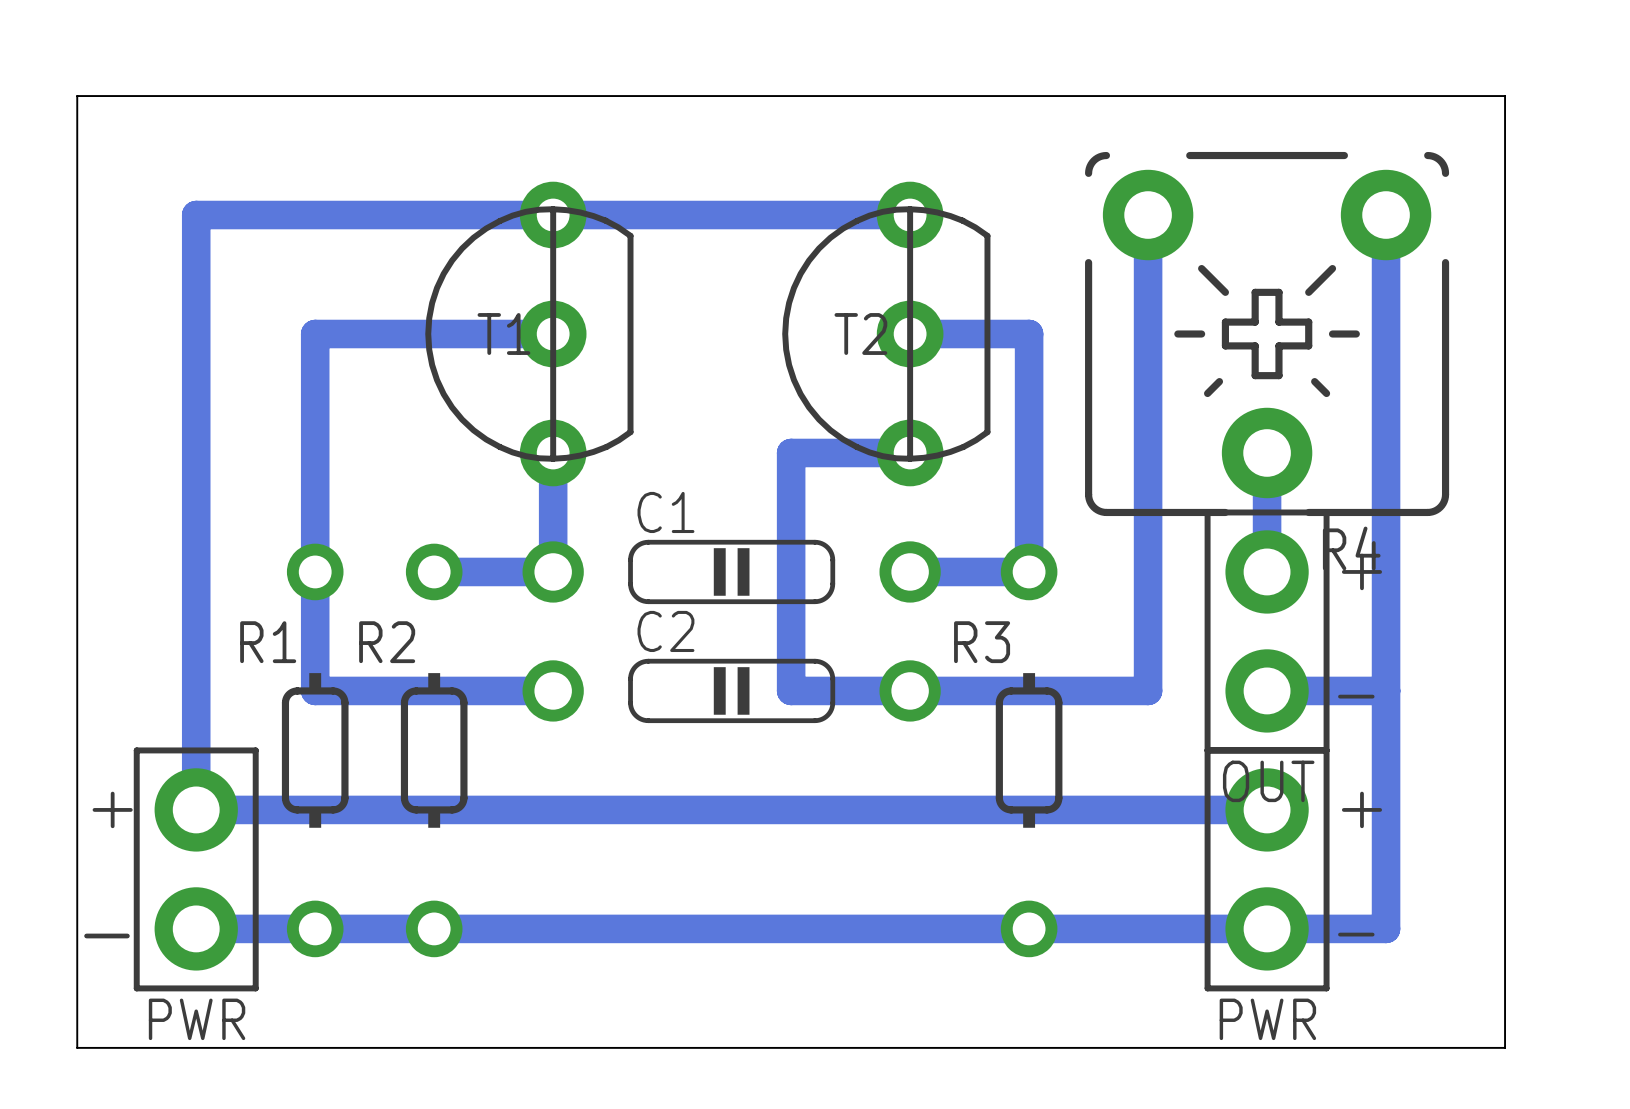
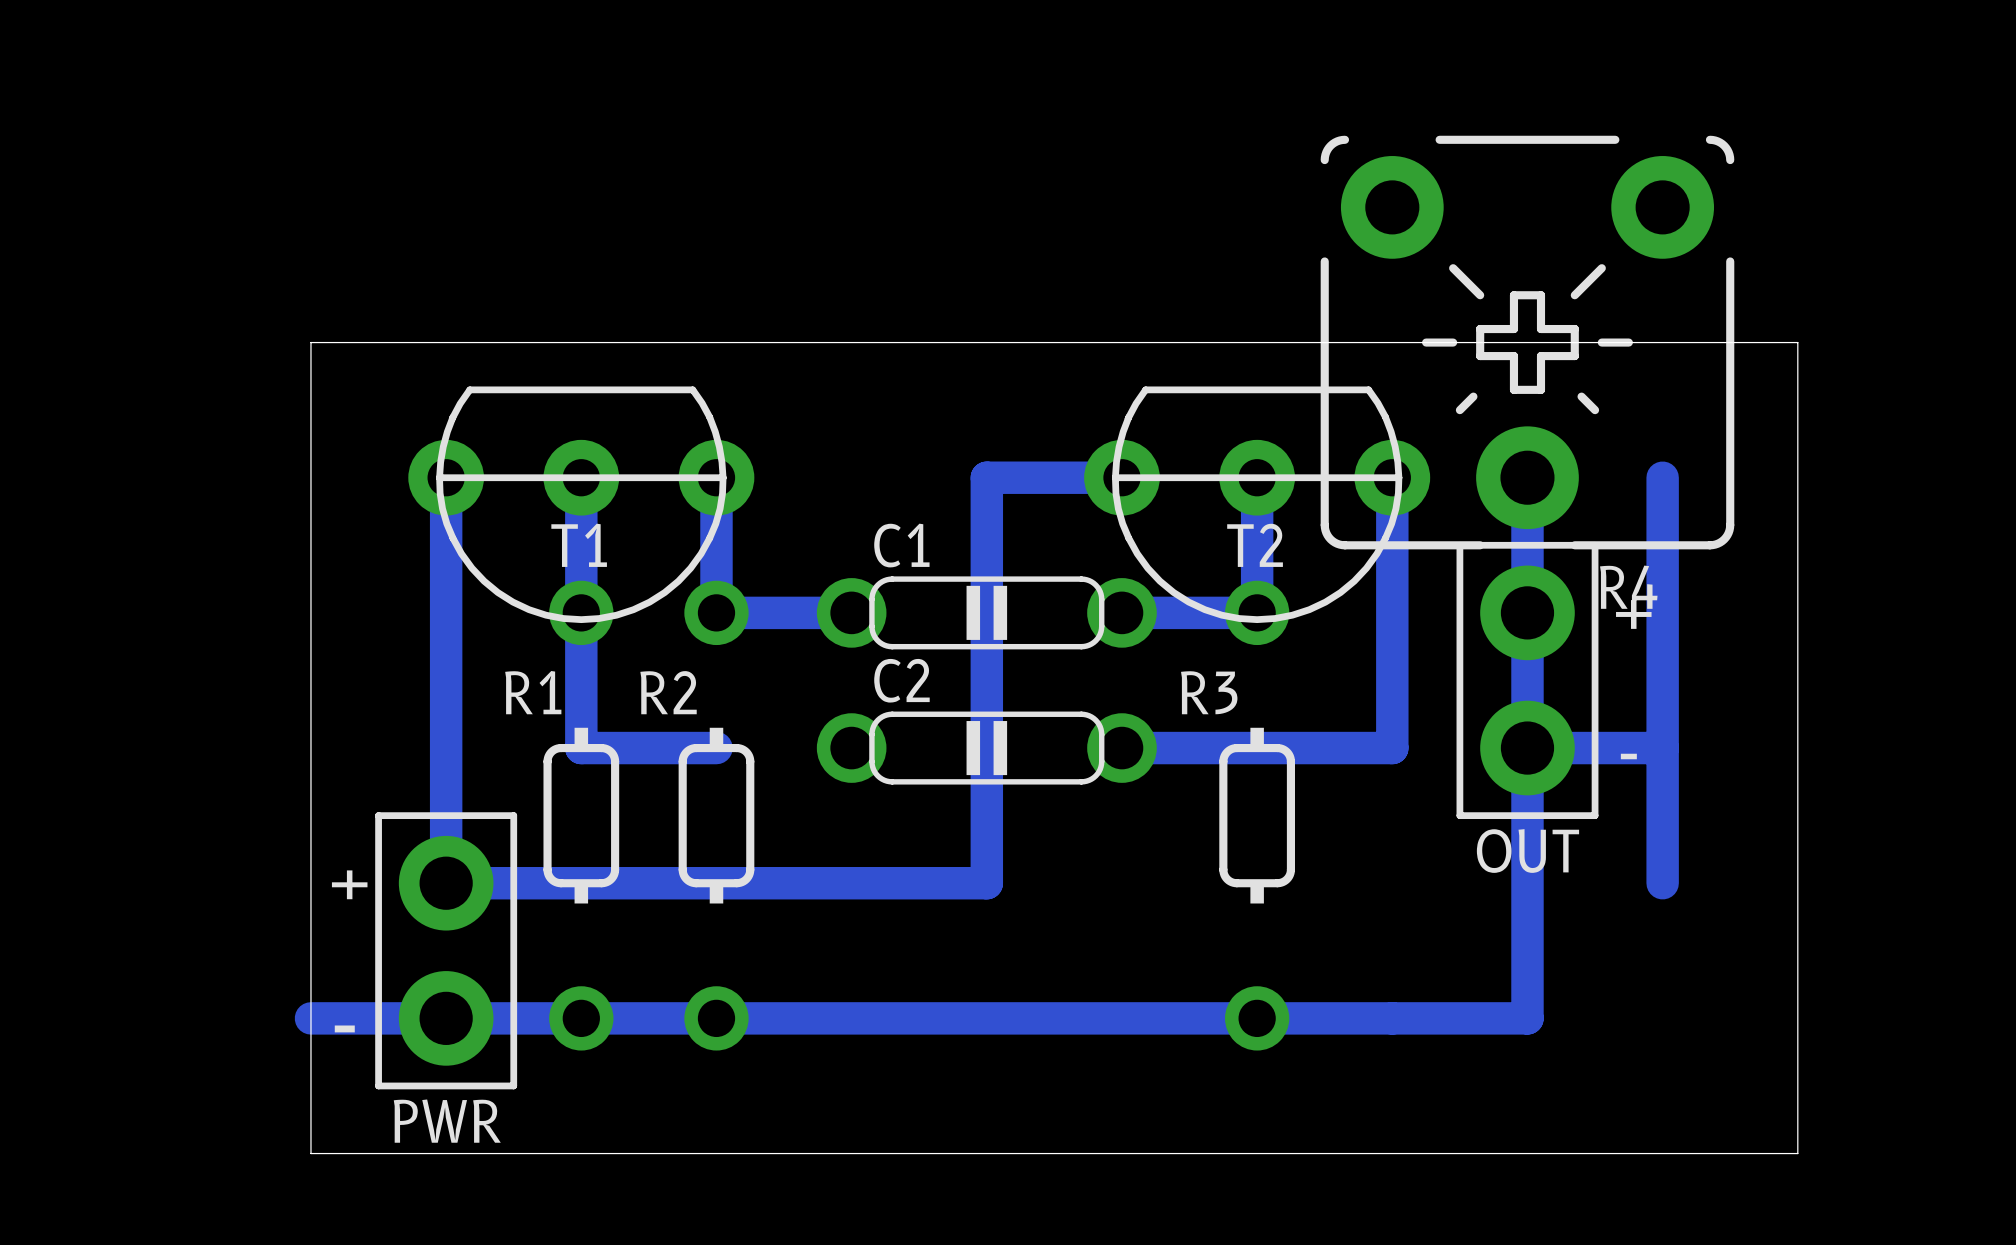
bottom track: (910, 215) (196, 215) (196, 809) (315, 809) -> none
bottom track: (1148, 215) (1148, 452) -> (581, 477) (581, 748)
bottom track: (1386, 215) (1386, 452) -> none
T1 rotation: 0° (529, 334) -> 90° counterclockwise (581, 504)
bottom track: (553, 334) (315, 334) (315, 452) -> none
T2 rotation: 0° (886, 334) -> 90° counterclockwise (1257, 504)
T2 position: (886, 334) -> (1257, 504)
bottom track: (910, 334) (1029, 334) (1029, 452) -> none
board edge: (1505, 334) (1505, 96) (77, 96) (77, 1047) (196, 1047) -> (1797, 342) (310, 342) (310, 1153)
C1 footprint: [522, 539, 941, 605] -> [816, 576, 1157, 650]
bottom track: (434, 571) (553, 571) -> (851, 612) (716, 612)
R2 name: R2 (387, 642) -> R1 (533, 692)
C2 footprint: [522, 658, 941, 724] -> [816, 711, 1157, 785]
bottom track: (315, 690) (434, 690) -> (446, 748) (446, 883)
bottom track: (791, 690) (910, 690) -> (986, 748) (986, 883)
R1: (315, 750) -> none
R2: none -> (716, 815)
bottom track: (791, 809) (1267, 809) -> none
bottom track: (1386, 809) (1386, 928) (1267, 928) -> (1527, 612) (1527, 1018)
part position: (196, 869) -> (446, 950)
PWR: (1267, 869) -> none

